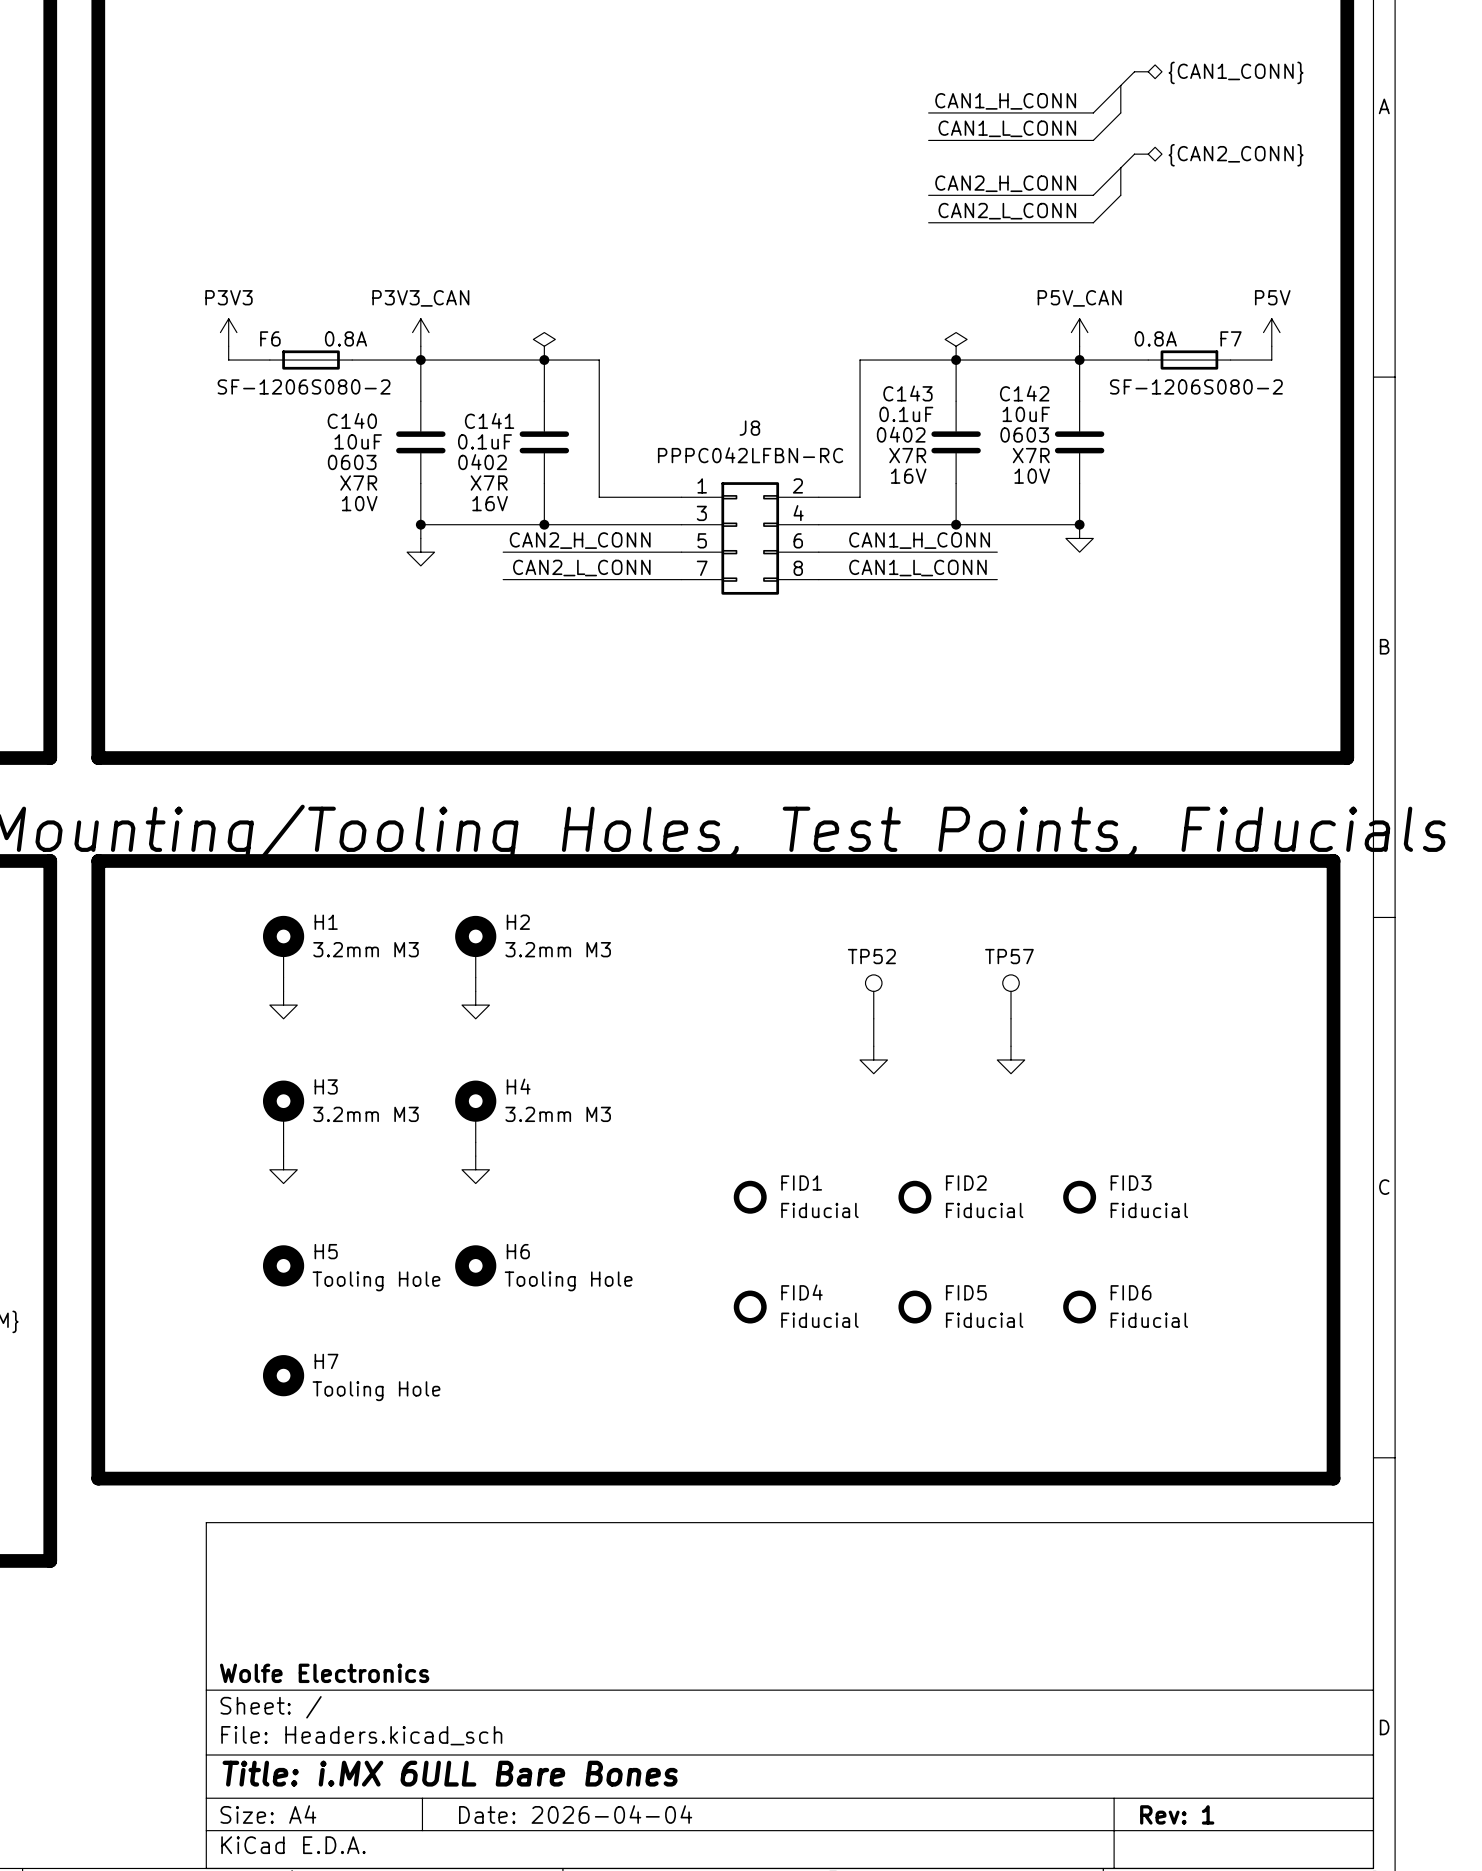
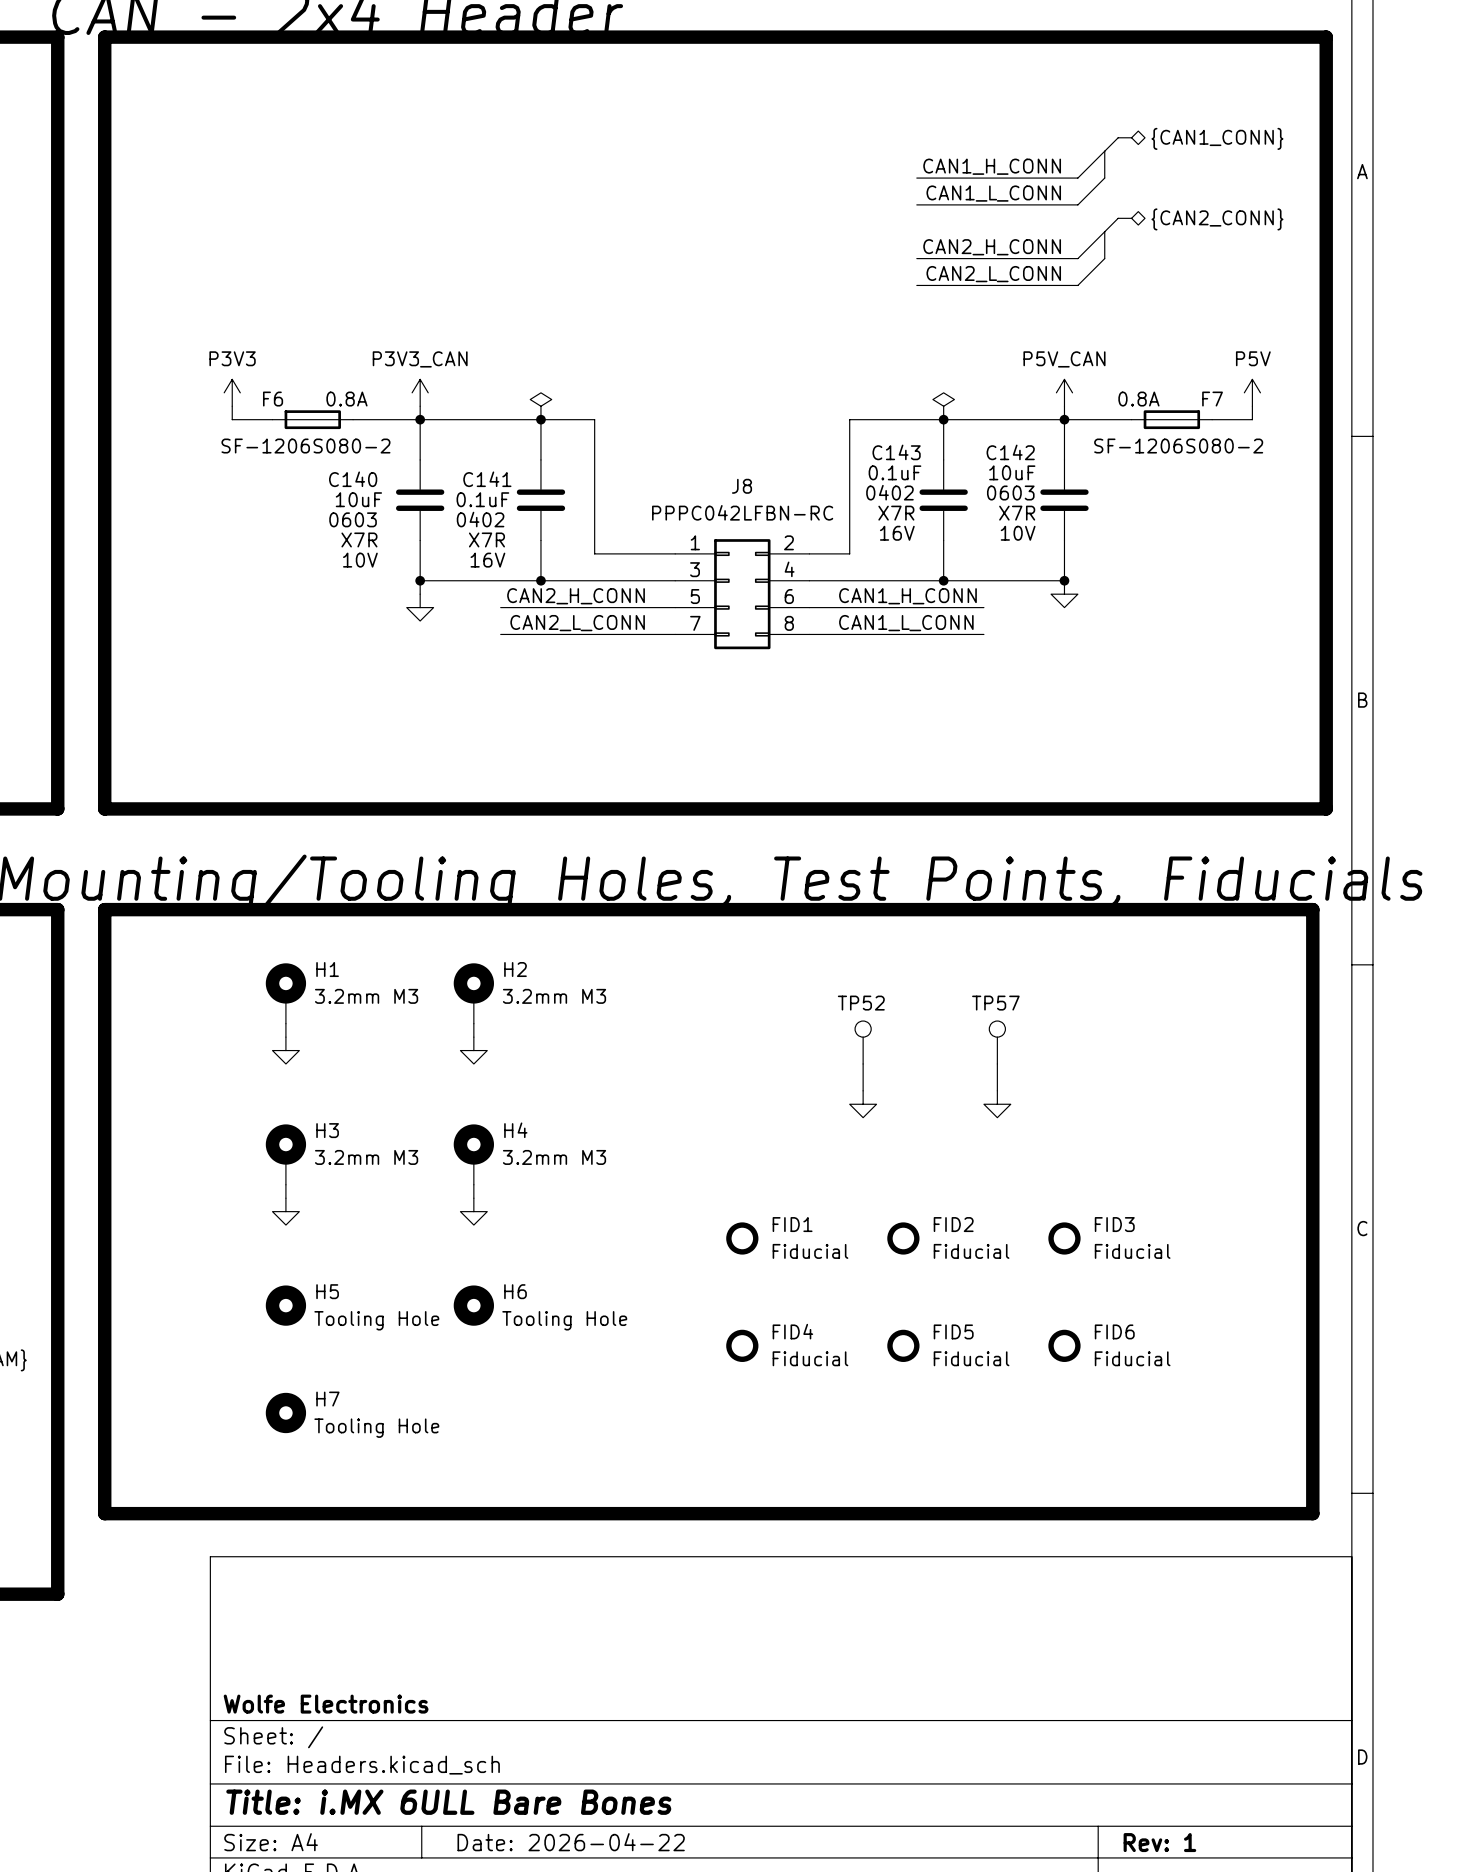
title block: Date: 2026-04-04 (575, 1814) -> Date: 2026-04-22 (571, 1842)

